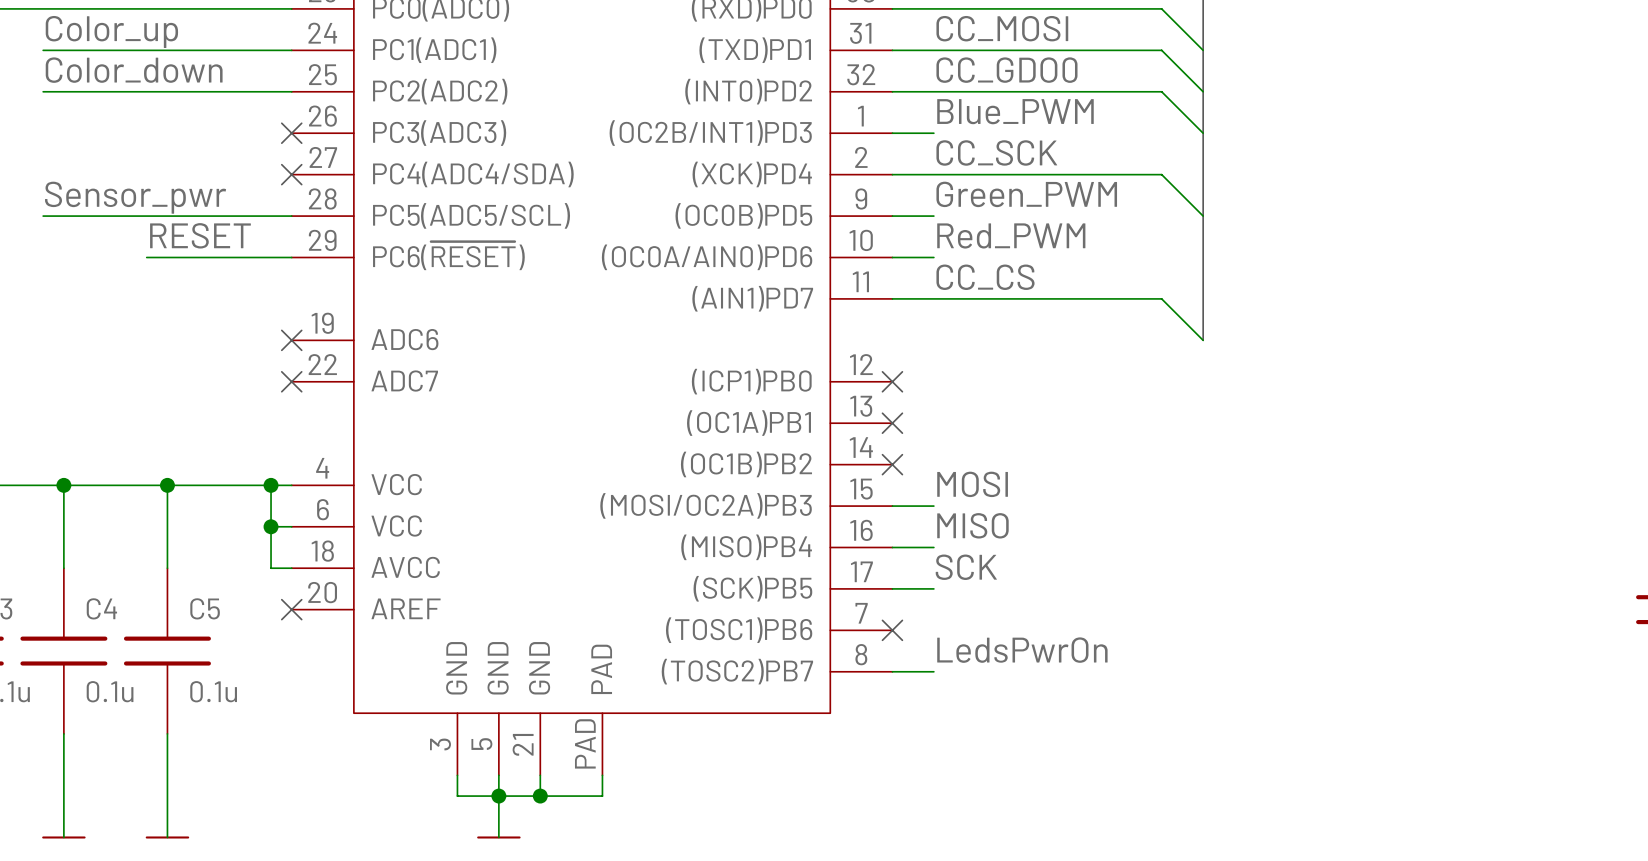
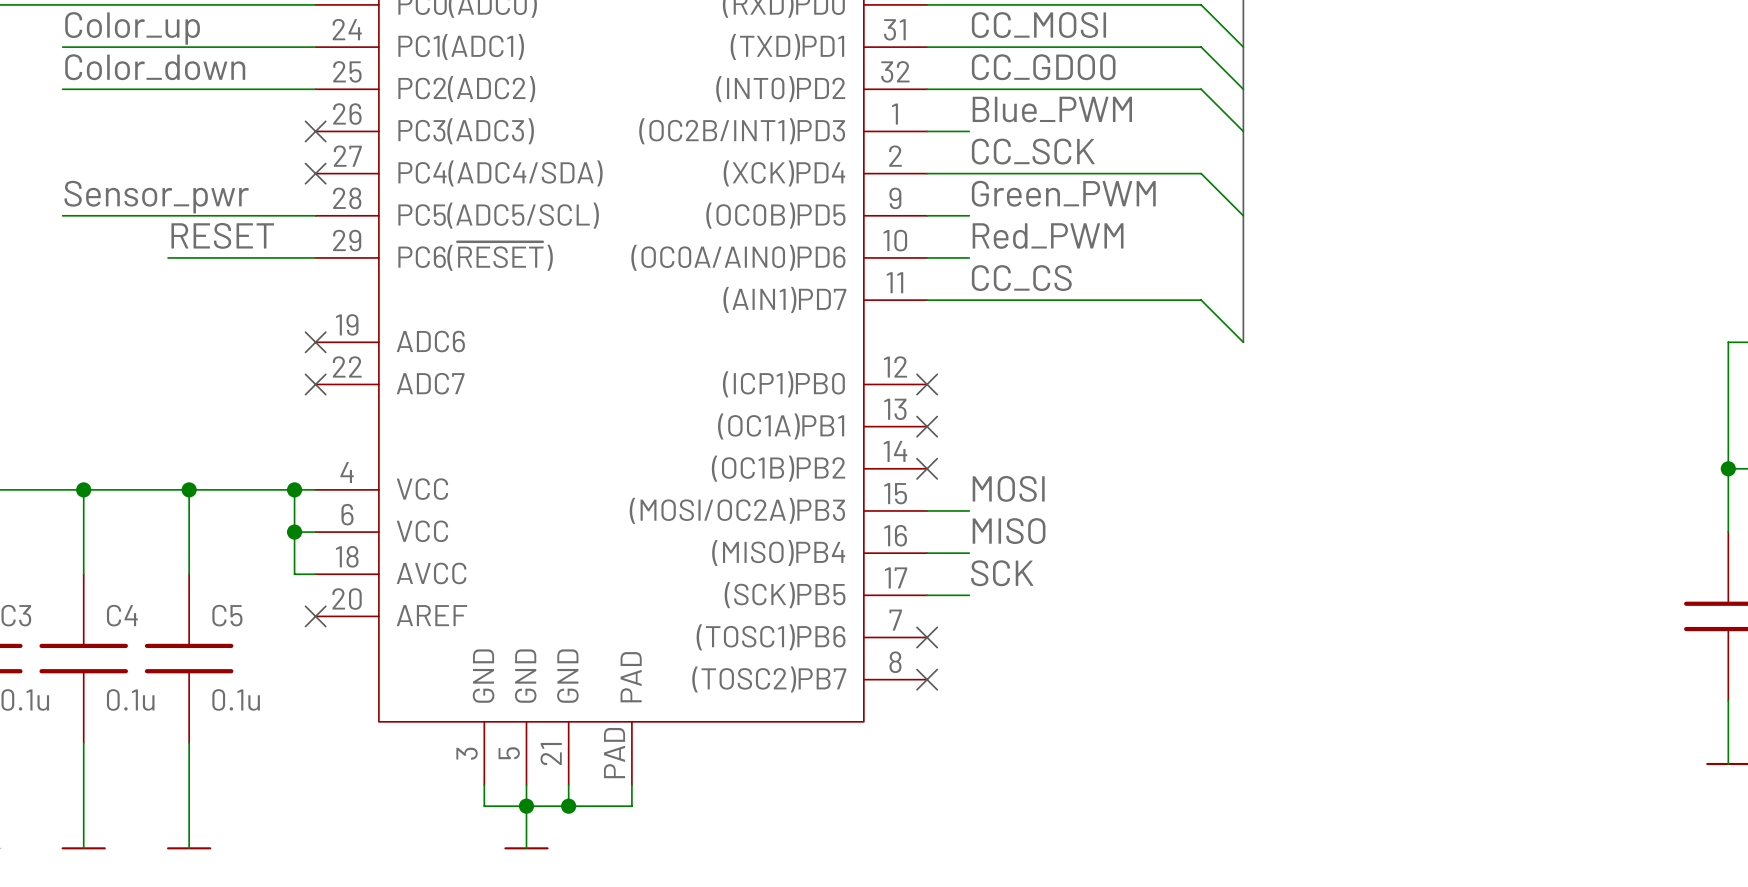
label: LedsPwrOn (1022, 650) -> none
wire: (892, 671) (933, 671) -> none
no-connect mark: none -> (927, 679)

